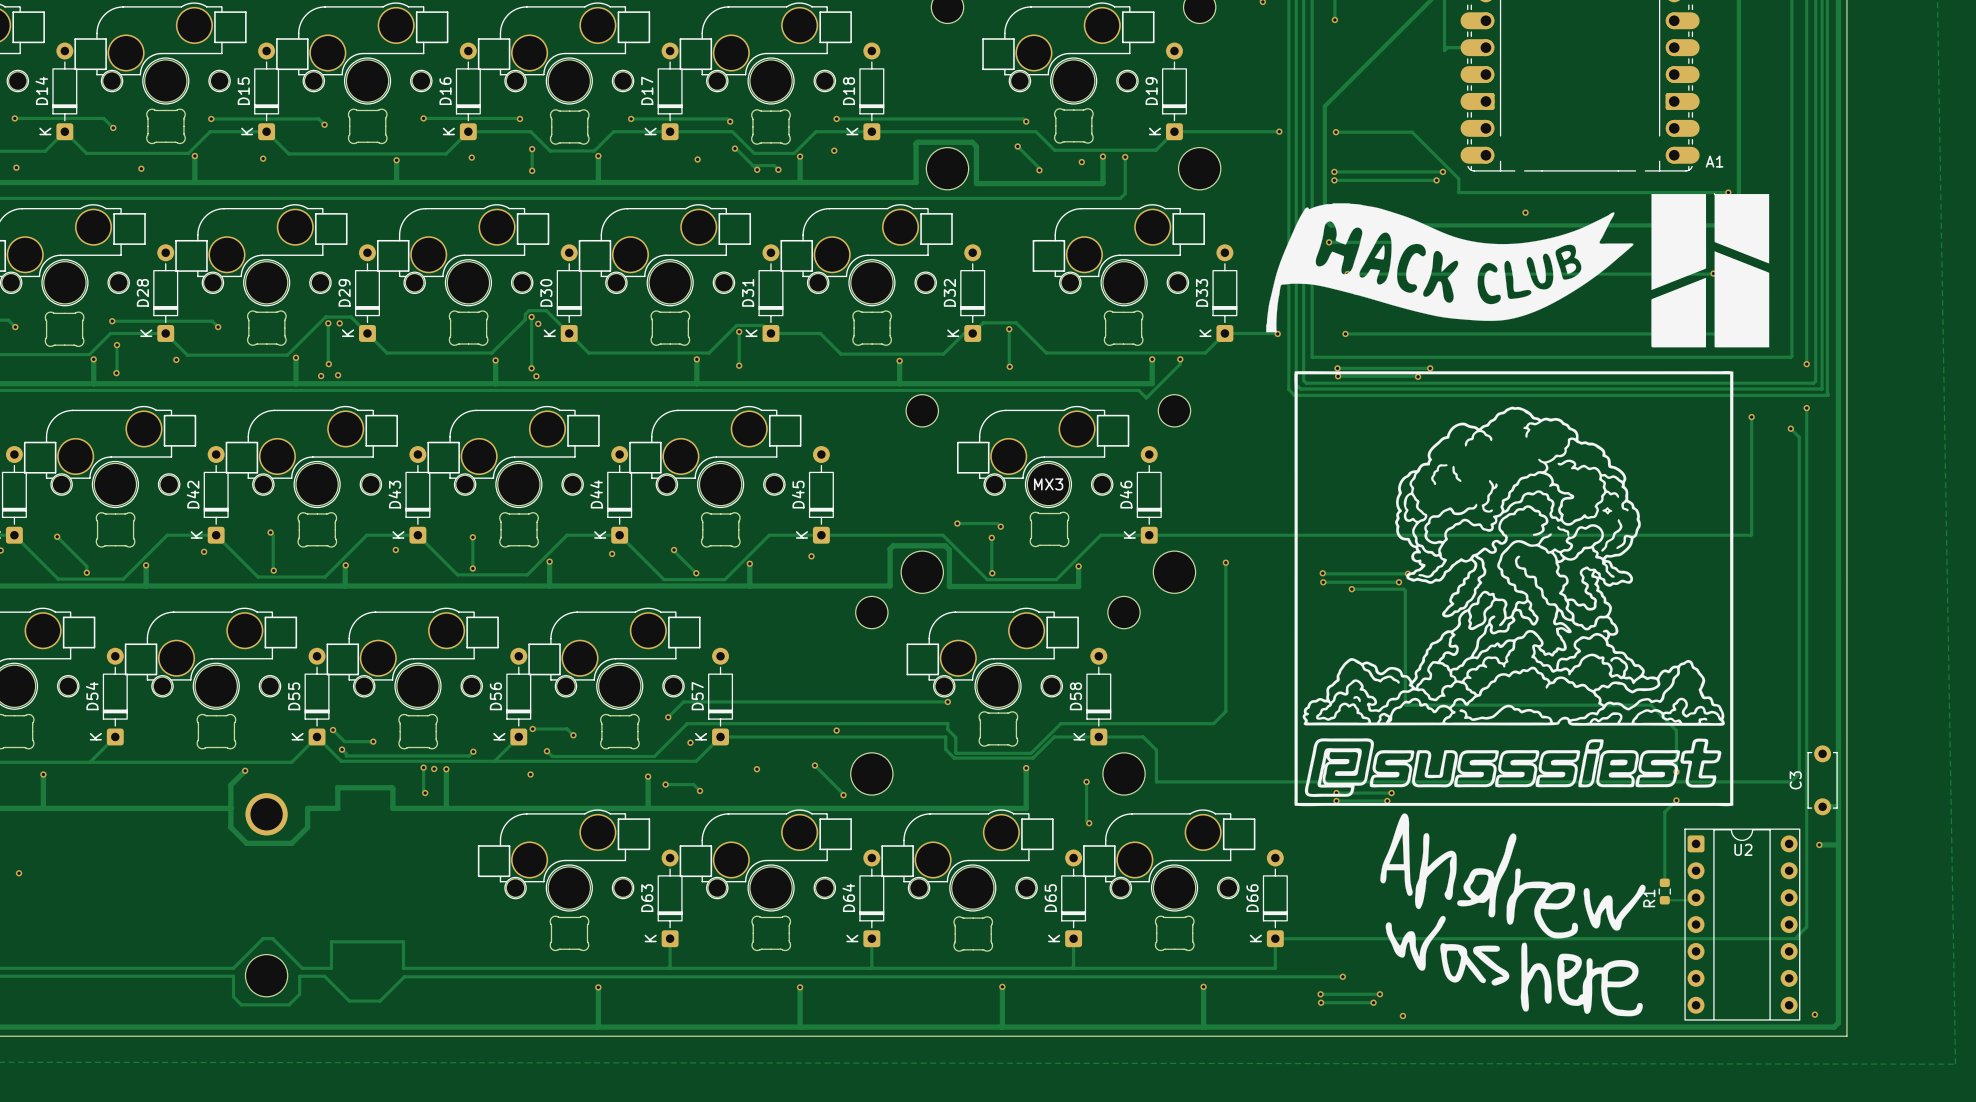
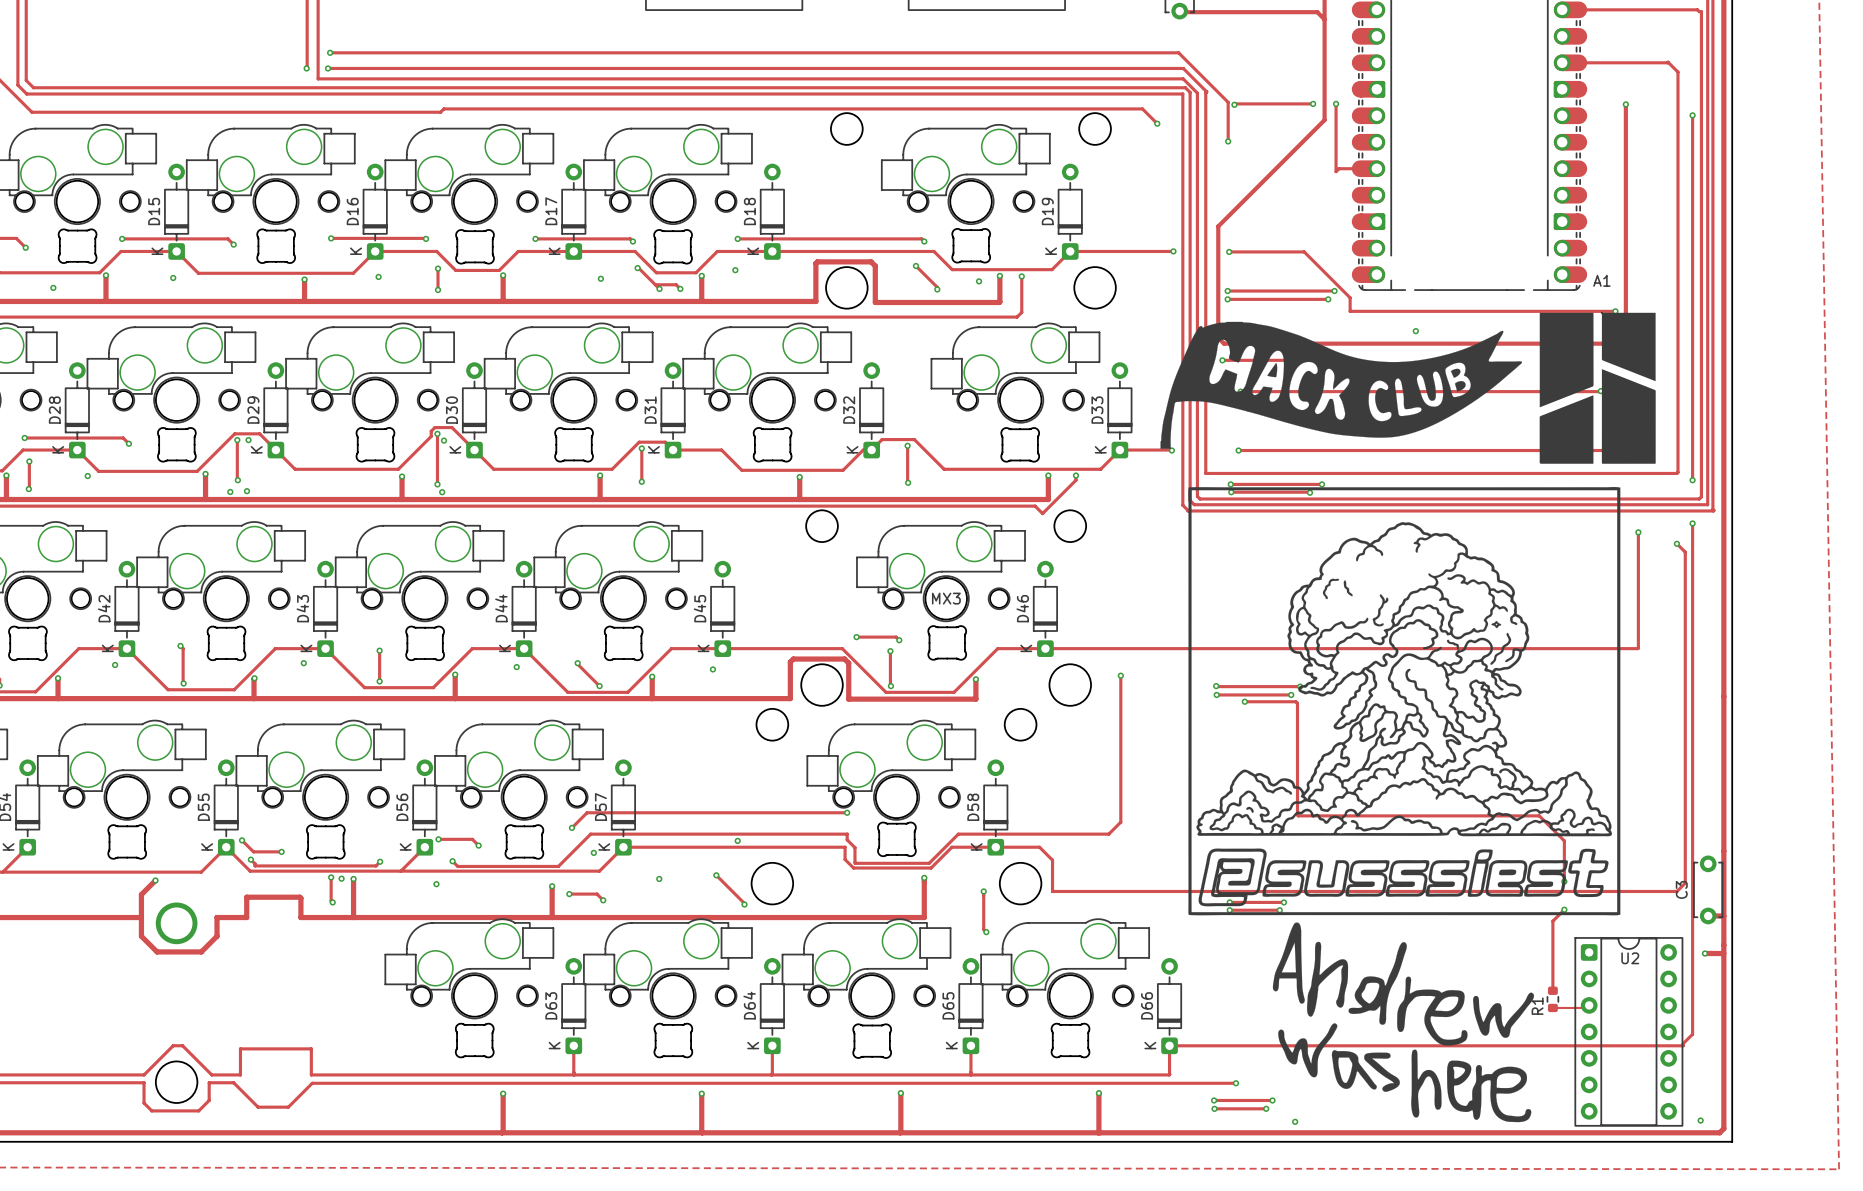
U2 footprint: [1684, 828, 1801, 1021] -> [1574, 937, 1684, 1127]

